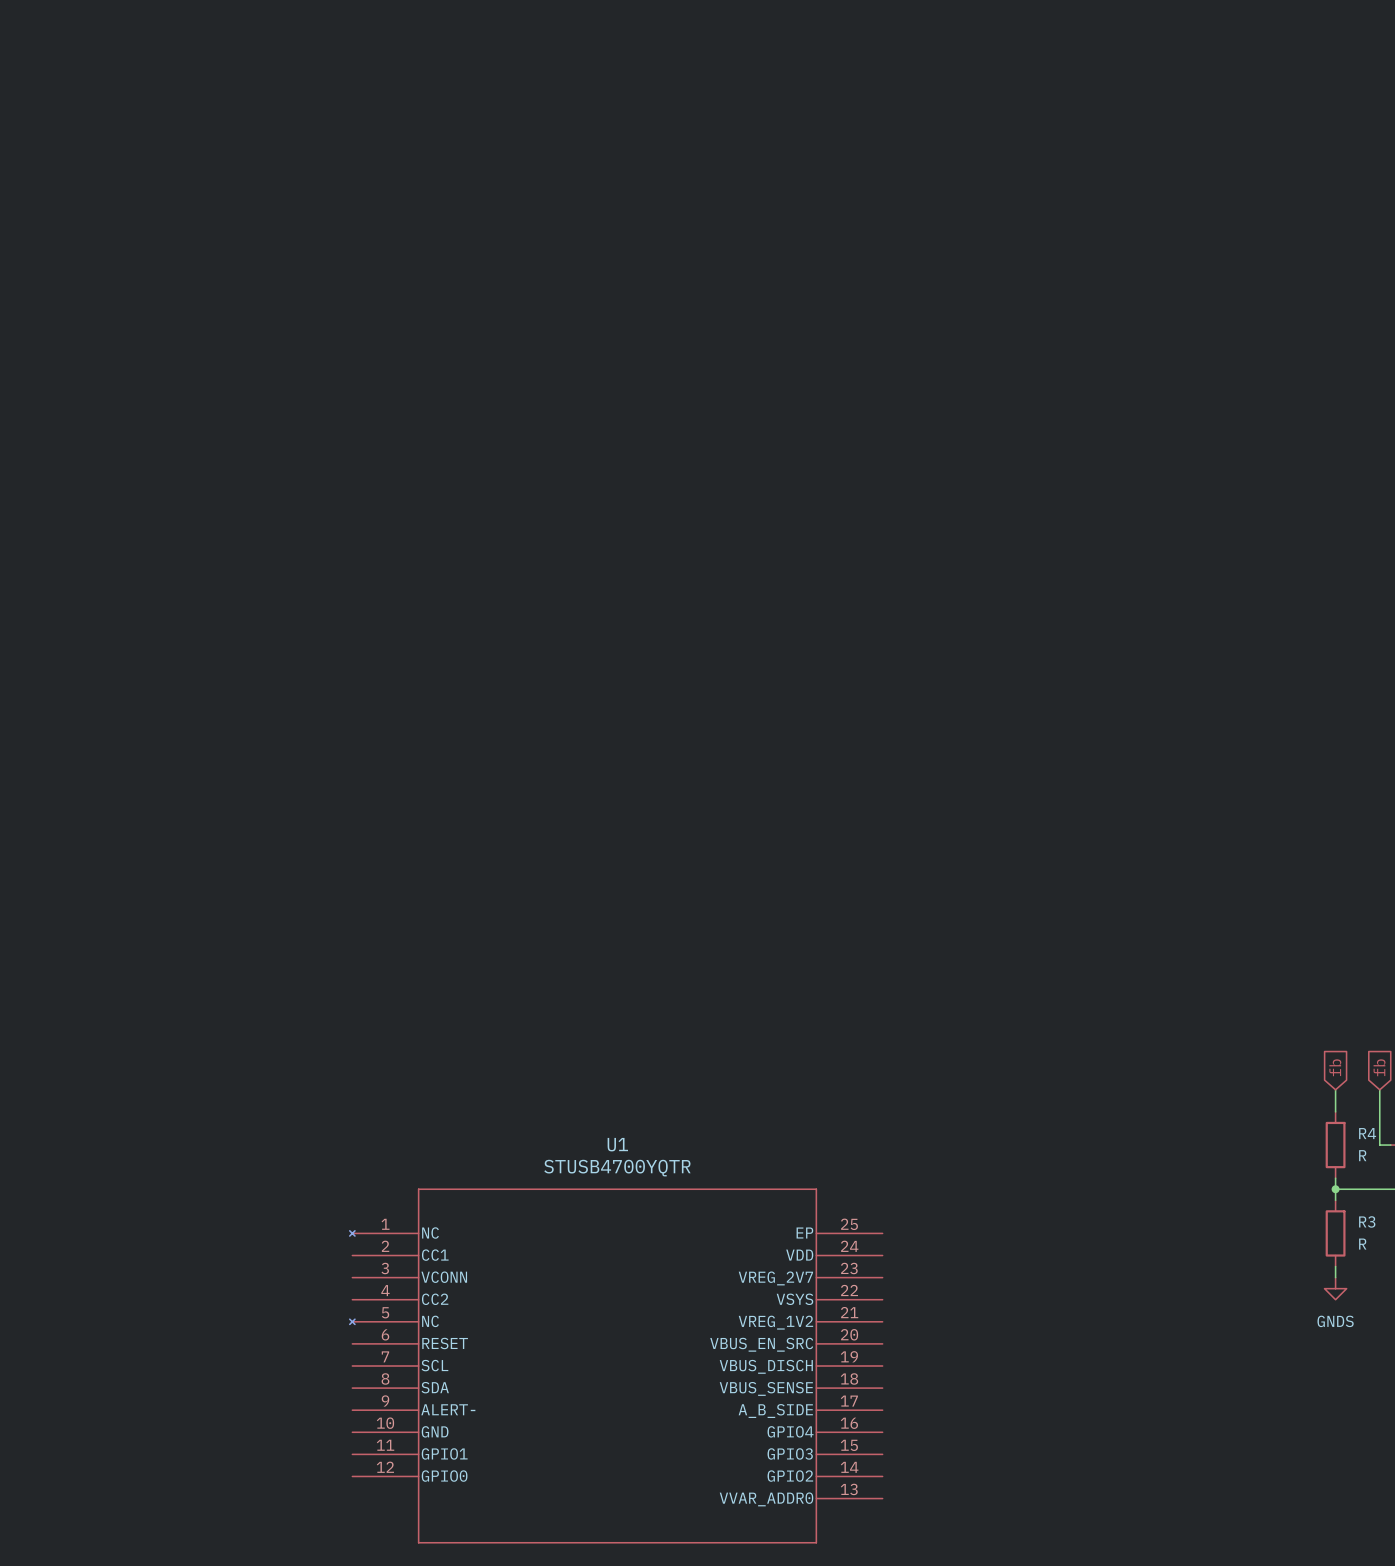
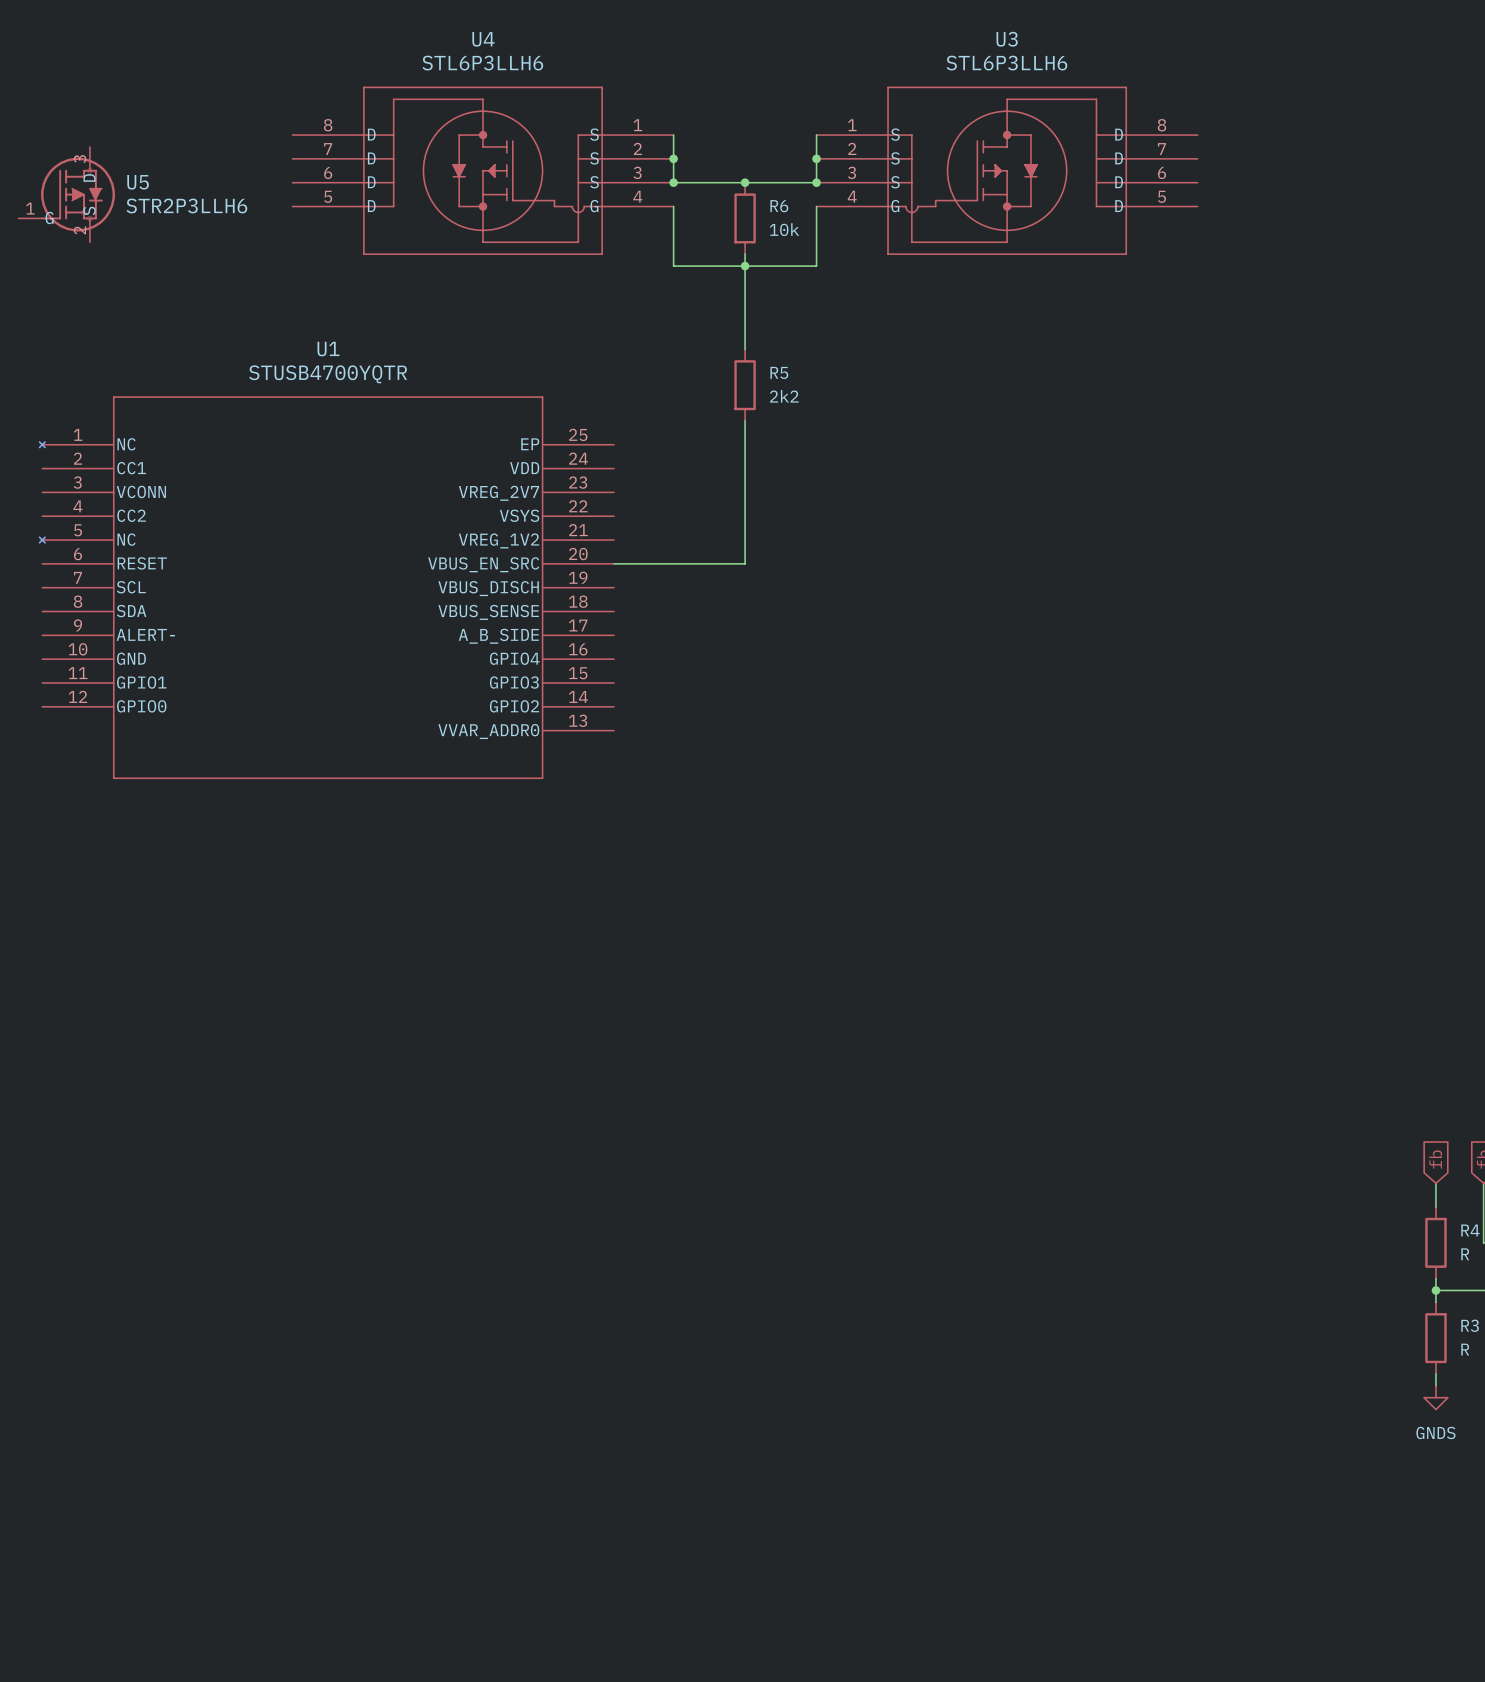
wire: none -> (673, 135) (673, 182) (816, 182) (816, 135)
junction: none -> (673, 158)
junction: none -> (816, 158)
U4: none -> STL6P3LLH6 (483, 170)
U3: none -> STL6P3LLH6 (1007, 170)
junction: none -> (673, 182)
junction: none -> (745, 182)
junction: none -> (816, 182)
U5: none -> STR2P3LLH6 (66, 194)
wire: none -> (673, 206) (673, 266) (816, 266) (816, 206)
R6: none -> 10k (745, 218)
wire: none -> (745, 254) (745, 349)
junction: none -> (745, 266)
R5: none -> 2k2 (745, 385)
wire: none -> (745, 420) (745, 563) (614, 563)
U1 position: (616, 1365) -> (326, 587)

